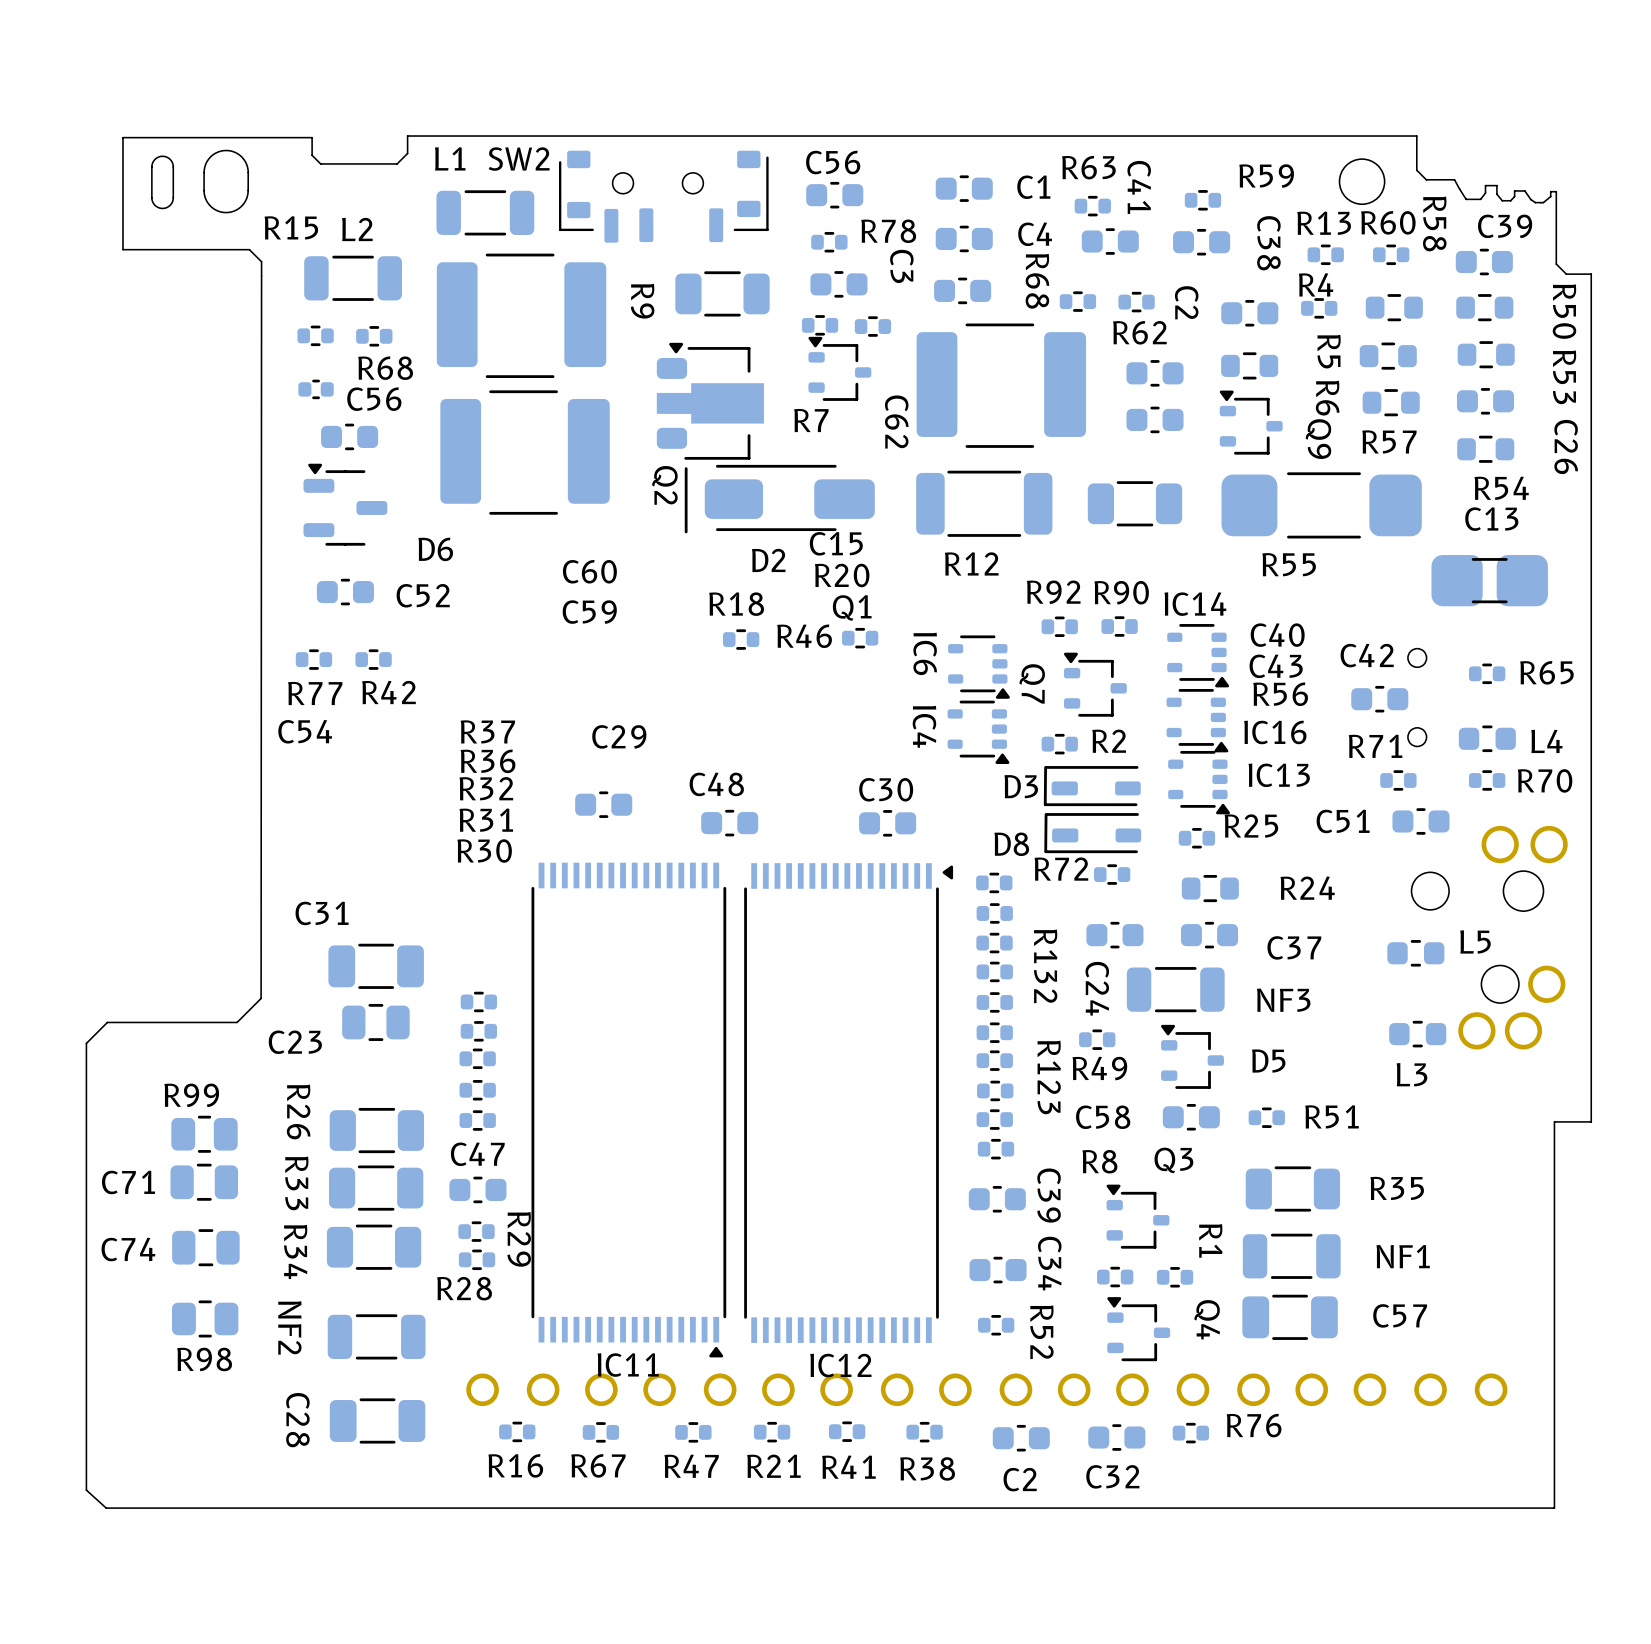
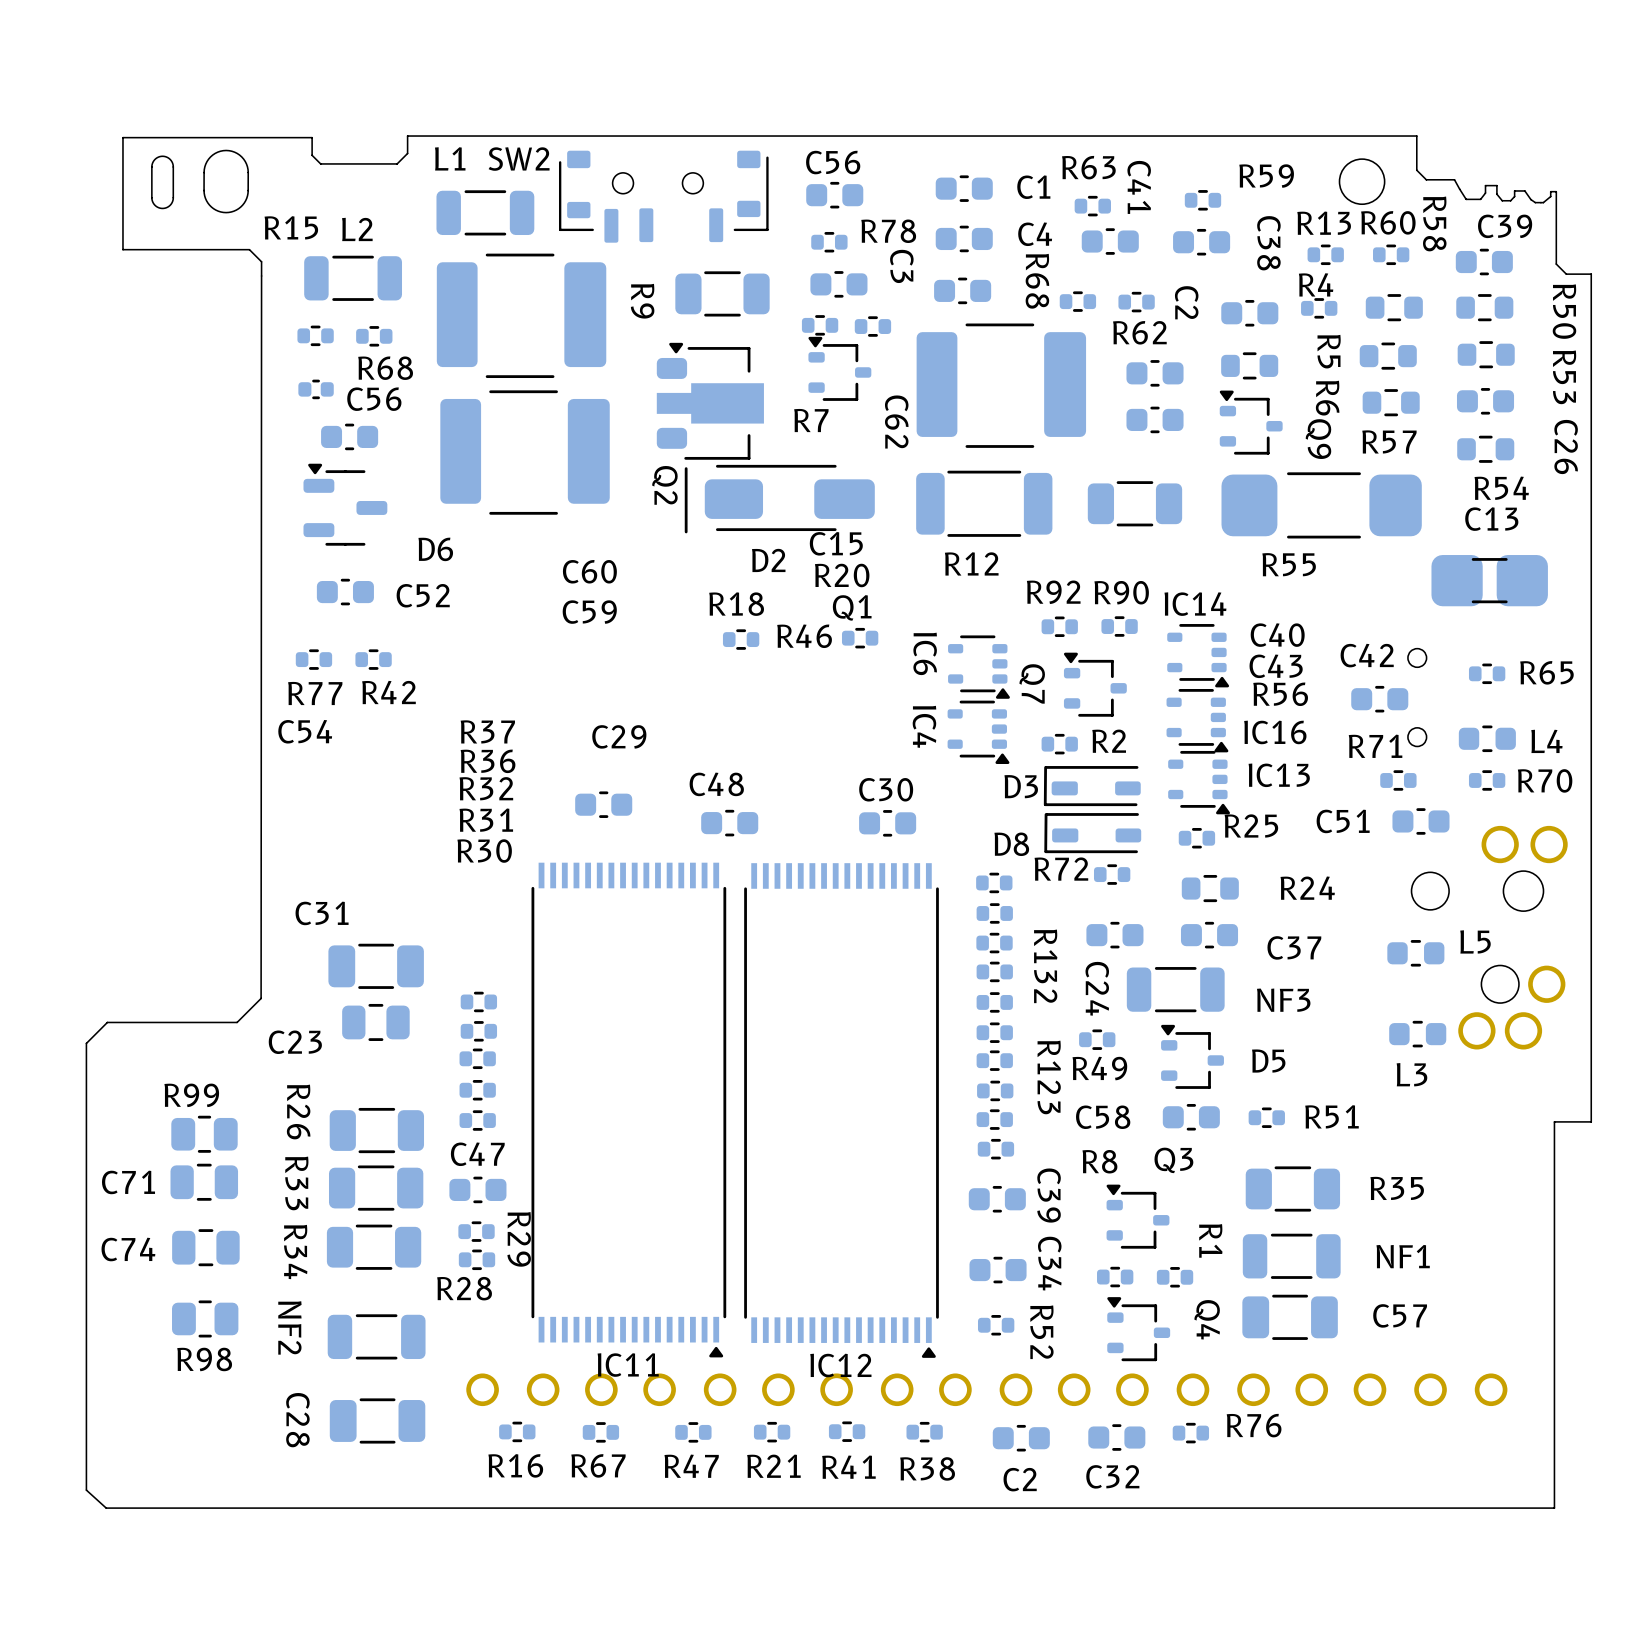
IC12 footprint: [744, 863, 954, 1343] -> [744, 863, 939, 1358]

